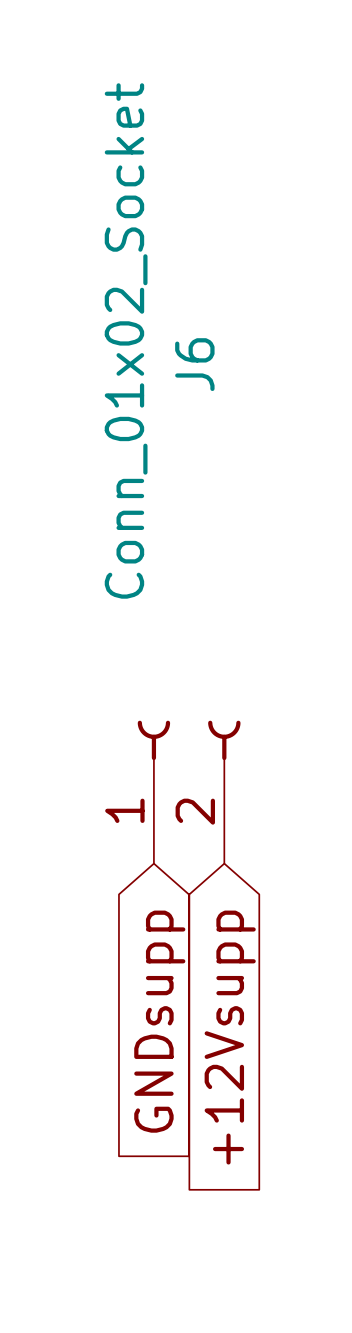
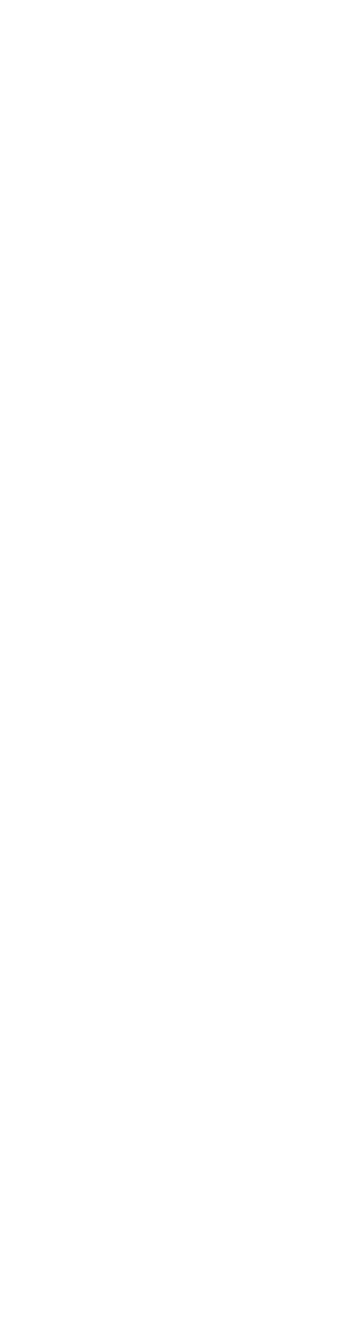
J6: Conn_01x02_Socket (189, 792) -> none
global label: GNDsupp (159, 1021) -> none
global label: +12Vsupp (230, 1037) -> none

